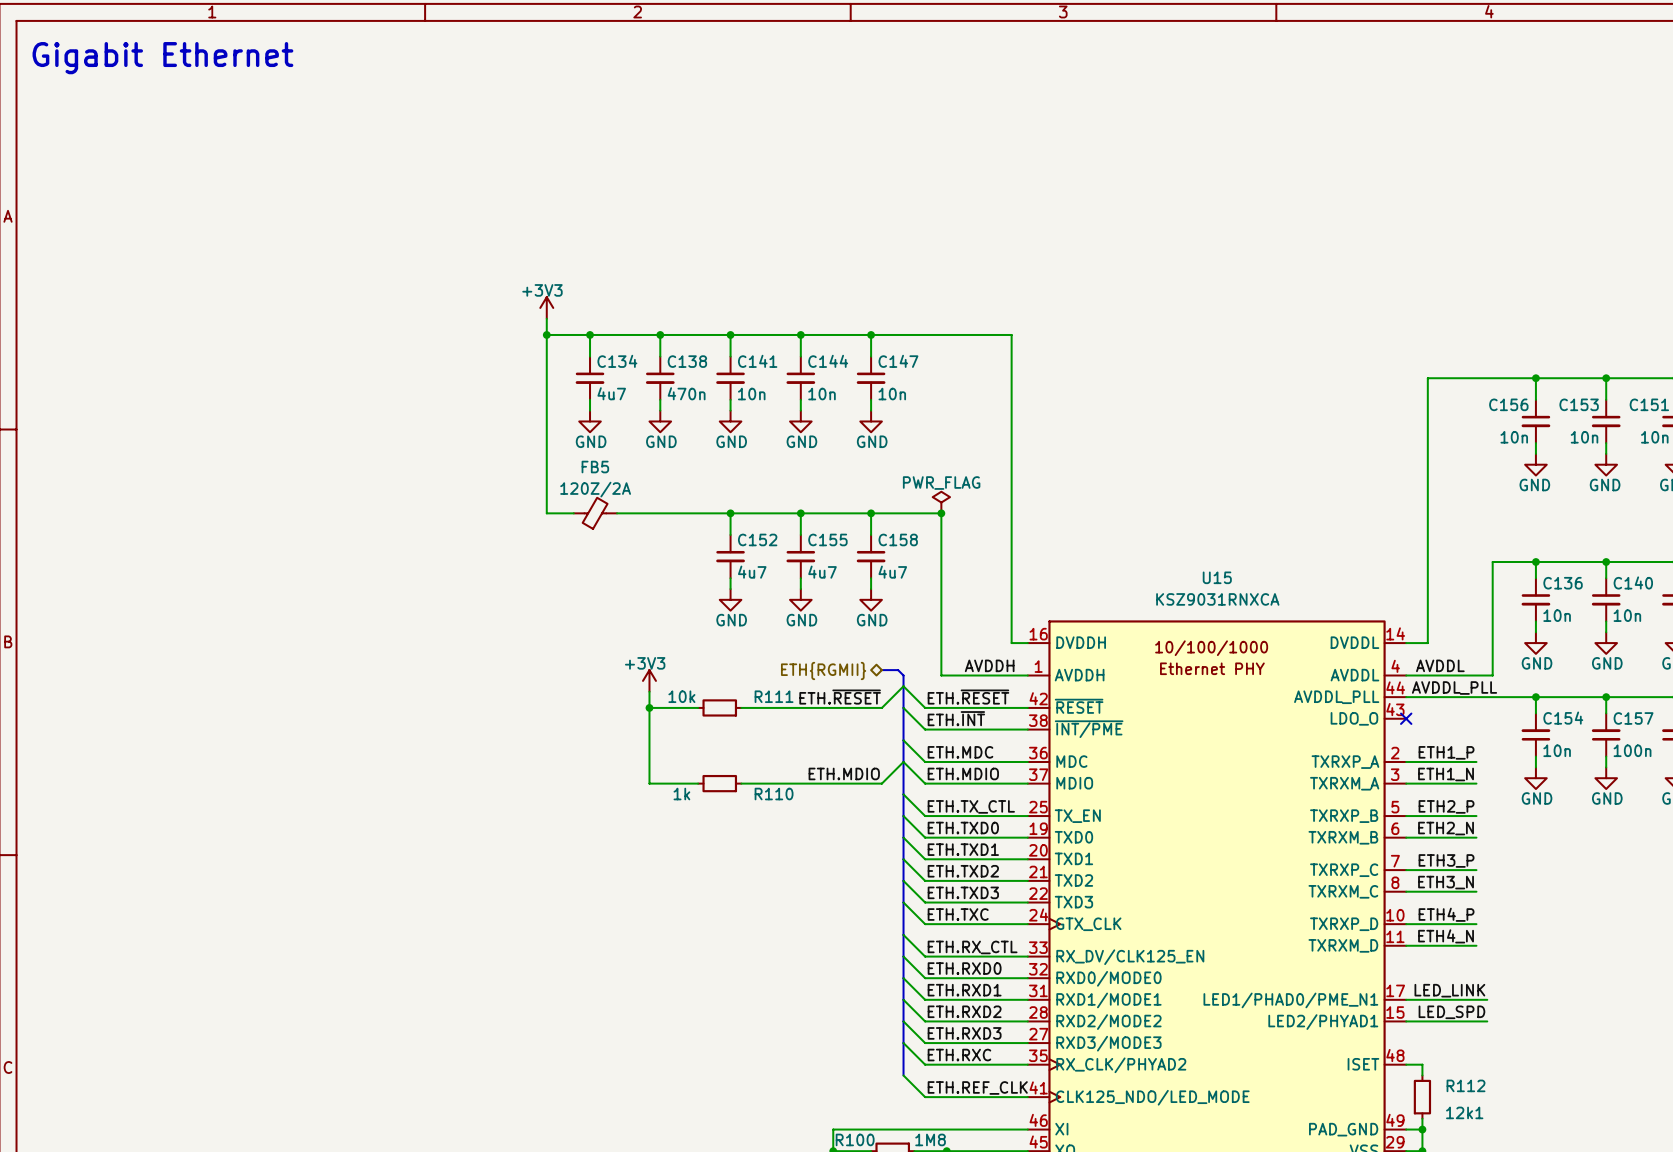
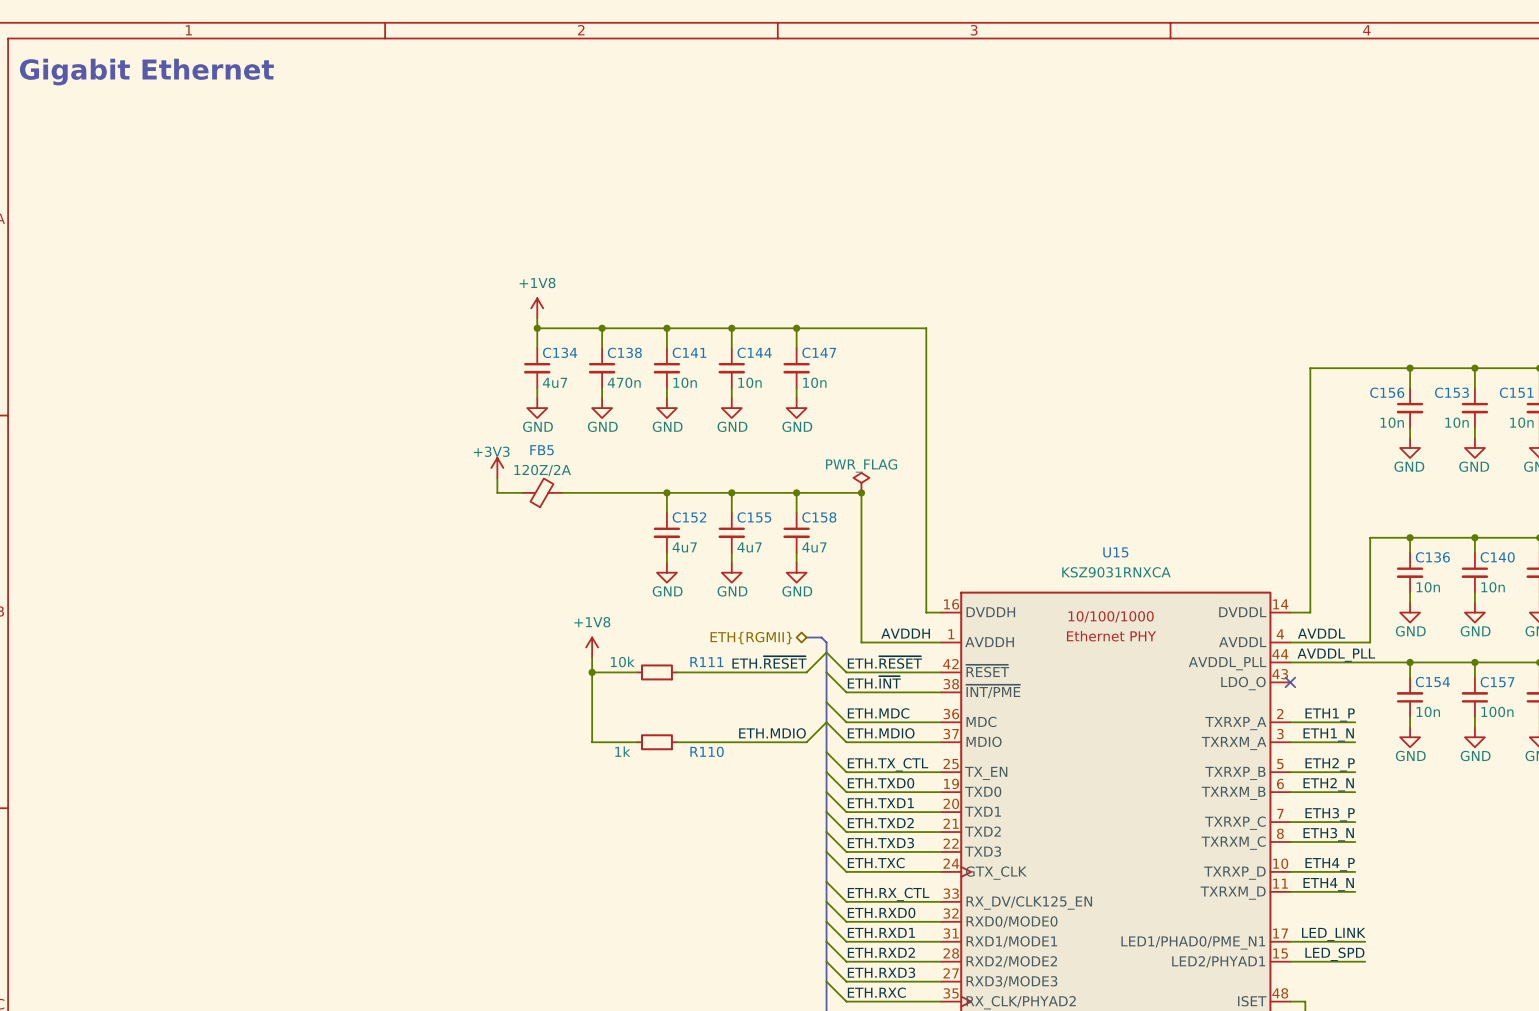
power symbol position: +3V3 (546, 307) -> +3V3 (497, 467)
power symbol: none -> +1V8 (537, 308)
wire: (546, 318) (546, 497) -> none
wire: (546, 334) (590, 334) -> (537, 318) (537, 328)
junction: (546, 334) -> none
power symbol: +3V3 (649, 680) -> +1V8 (592, 647)

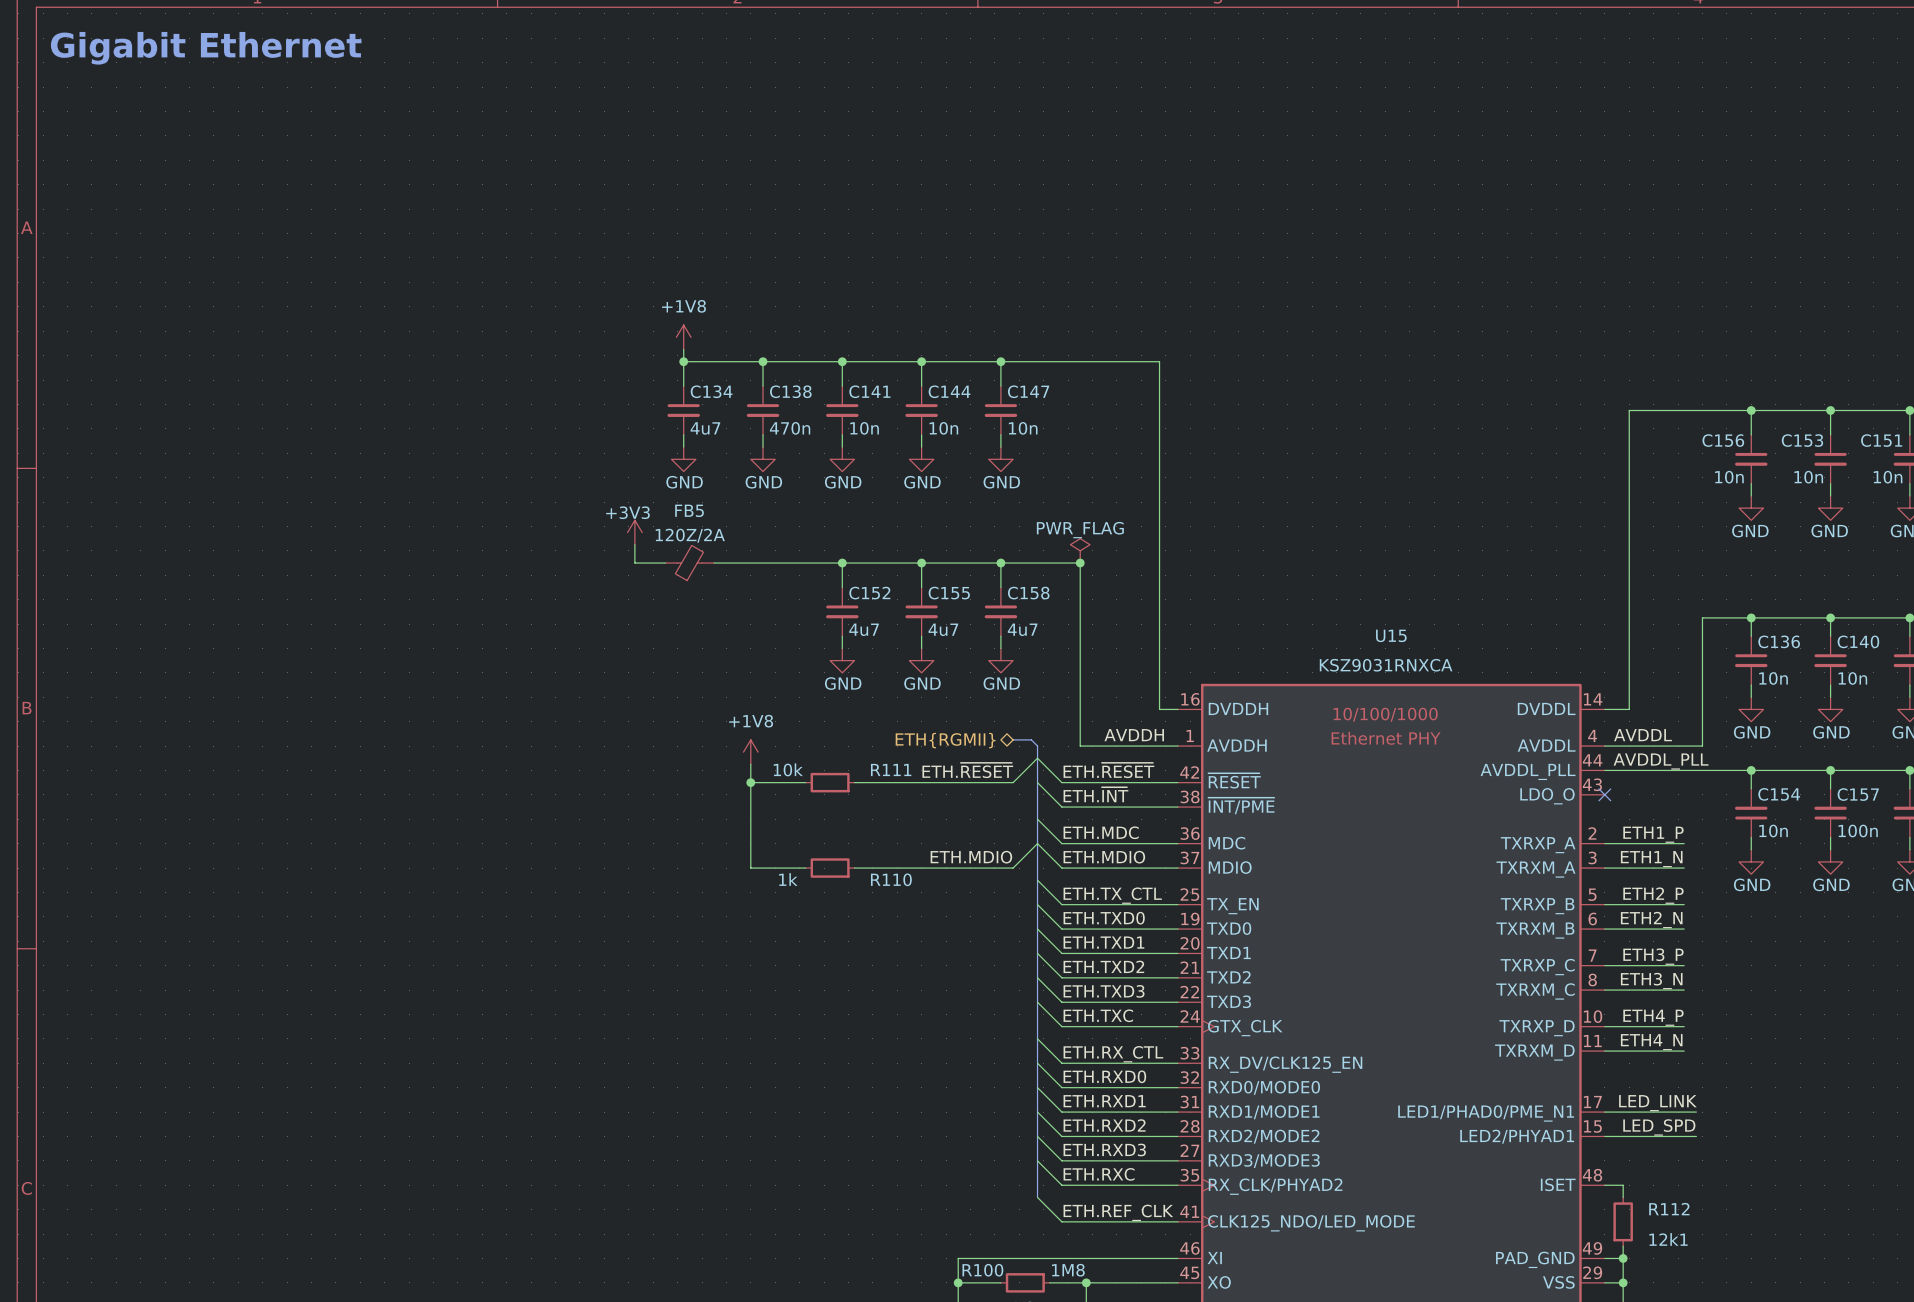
U15 value: KSZ9031RNXCA (1116, 572) -> none
U15 text: none -> KSZ9031RNXCA (1386, 665)

